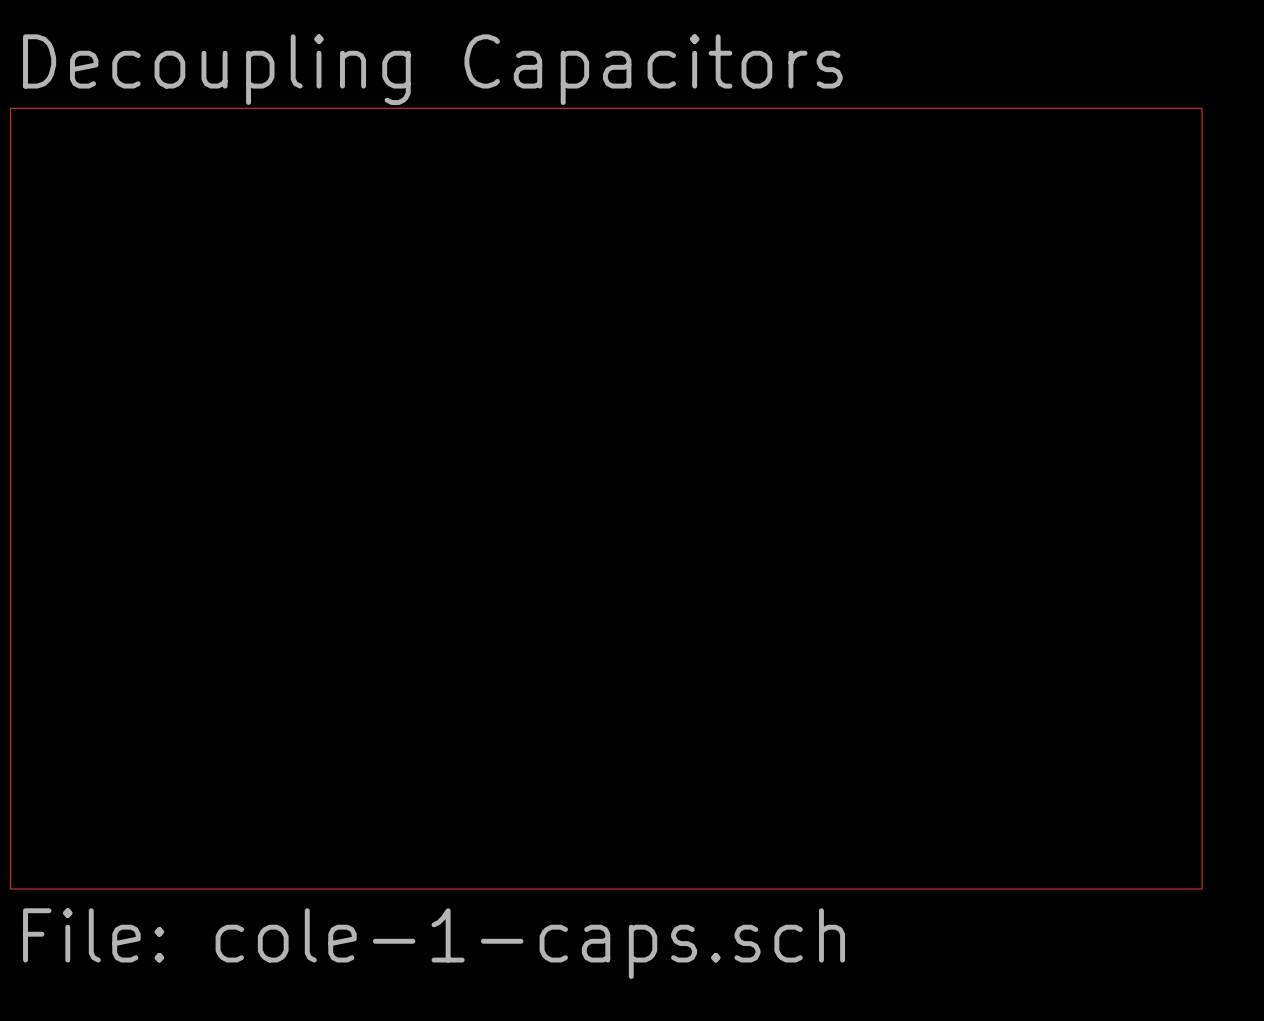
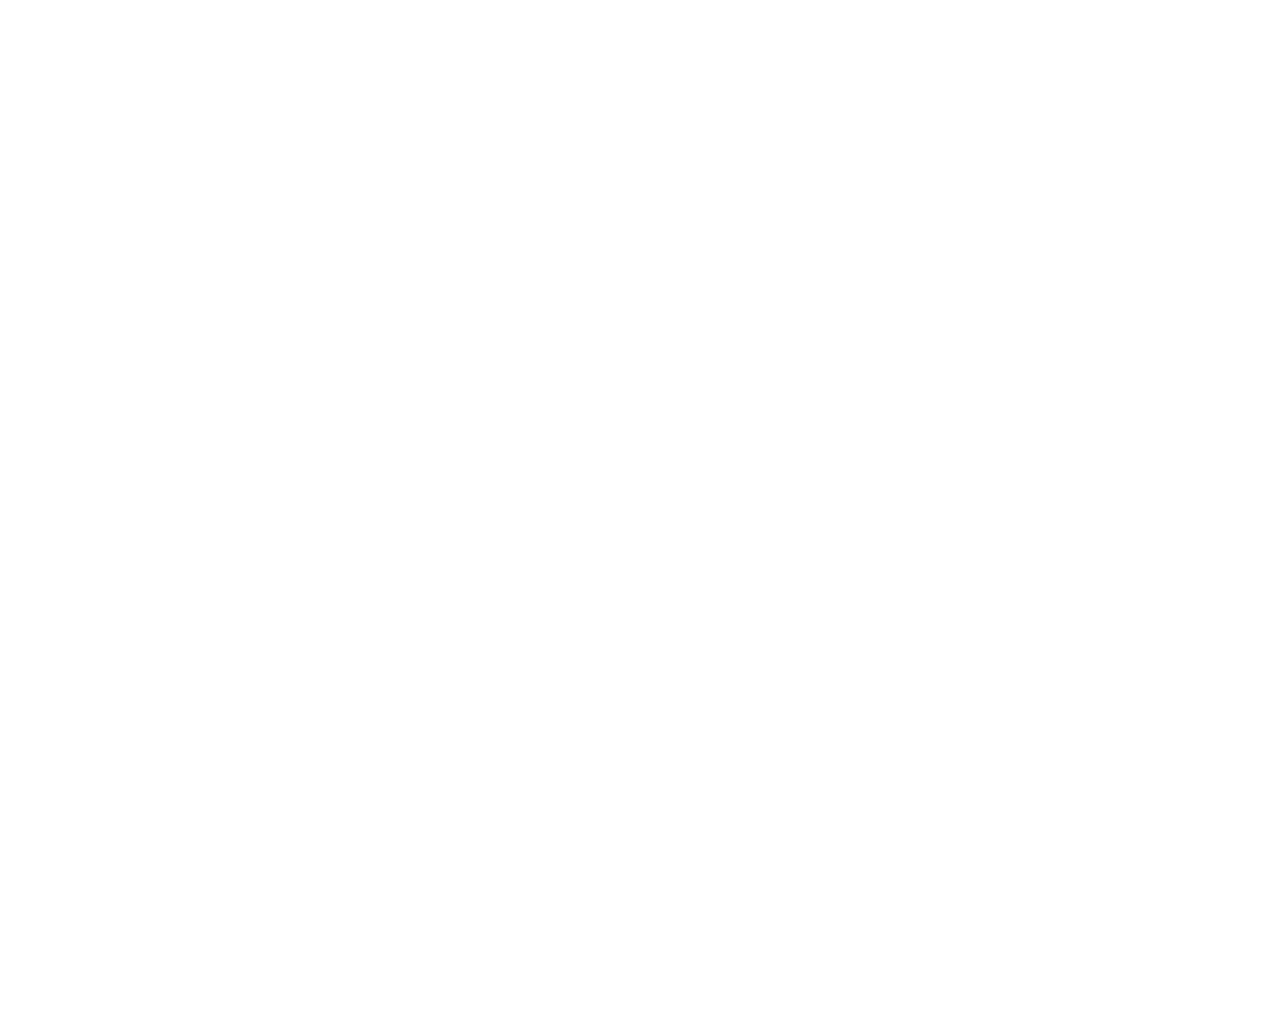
sheet Decoupling Capacitors: File: cole-1-caps.sch (606, 498) -> none

